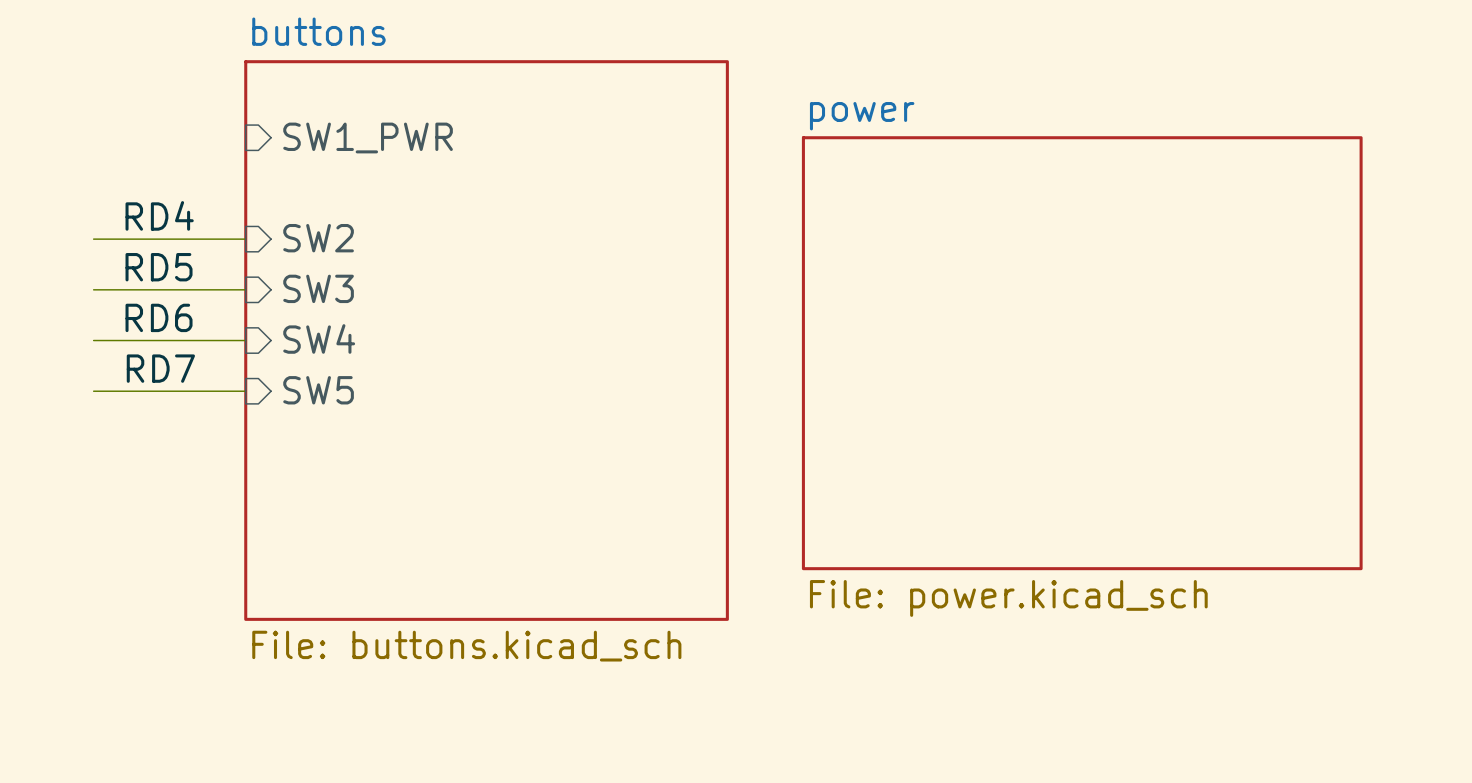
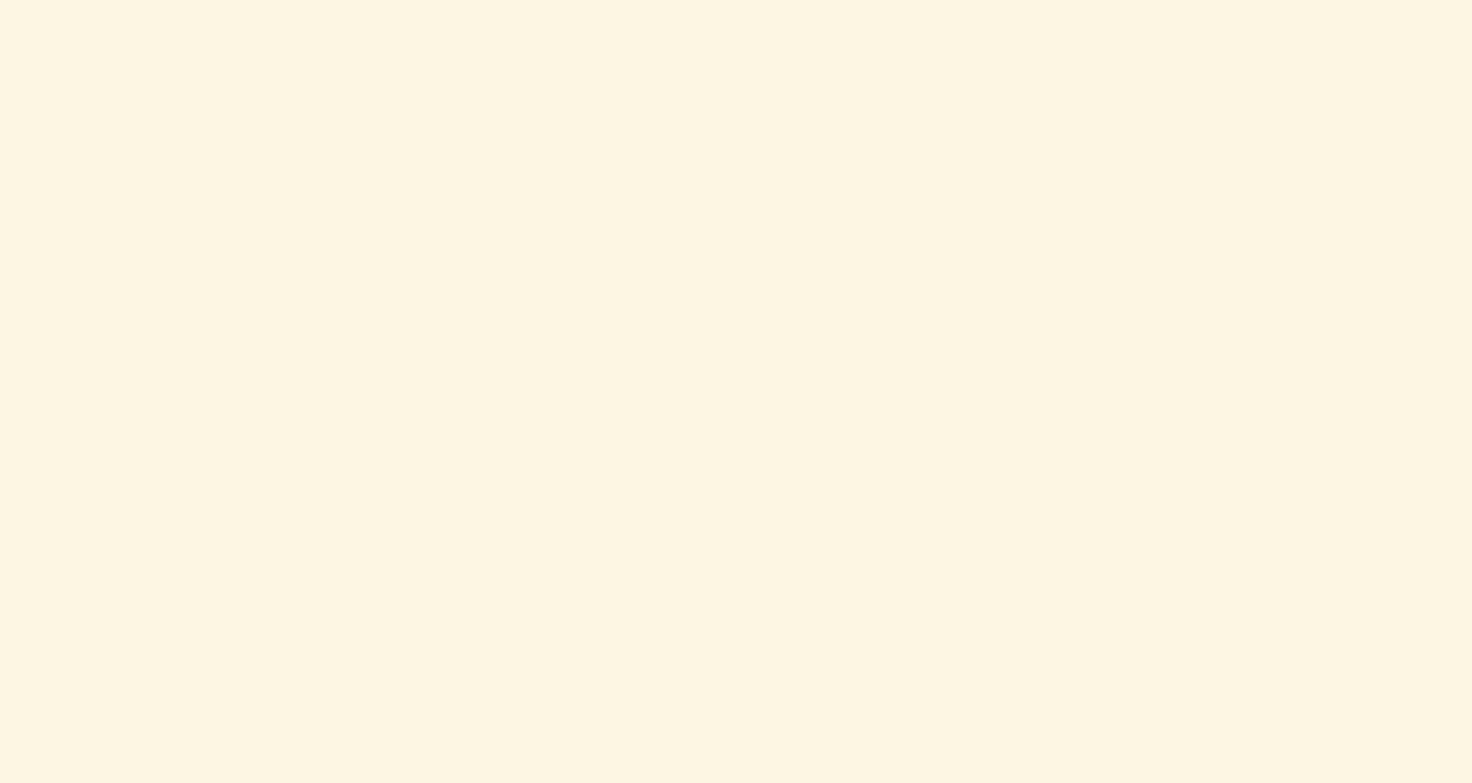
sheet pin: SW1_PWR (368, 137) -> none
label: RD4 (159, 215) -> none
sheet pin: SW2 (318, 238) -> none
wire: (93, 239) (245, 239) -> none
label: RD5 (159, 267) -> none
sheet pin: SW3 (318, 288) -> none
wire: (93, 289) (245, 289) -> none
label: RD6 (159, 317) -> none
sheet pin: SW4 (319, 338) -> none
wire: (93, 340) (245, 340) -> none
sheet buttons: File: buttons.kicad_sch (486, 340) -> none
sheet power: File: power.kicad_sch (1082, 353) -> none
label: RD7 (160, 368) -> none
sheet pin: SW5 (318, 390) -> none
wire: (93, 391) (245, 391) -> none

